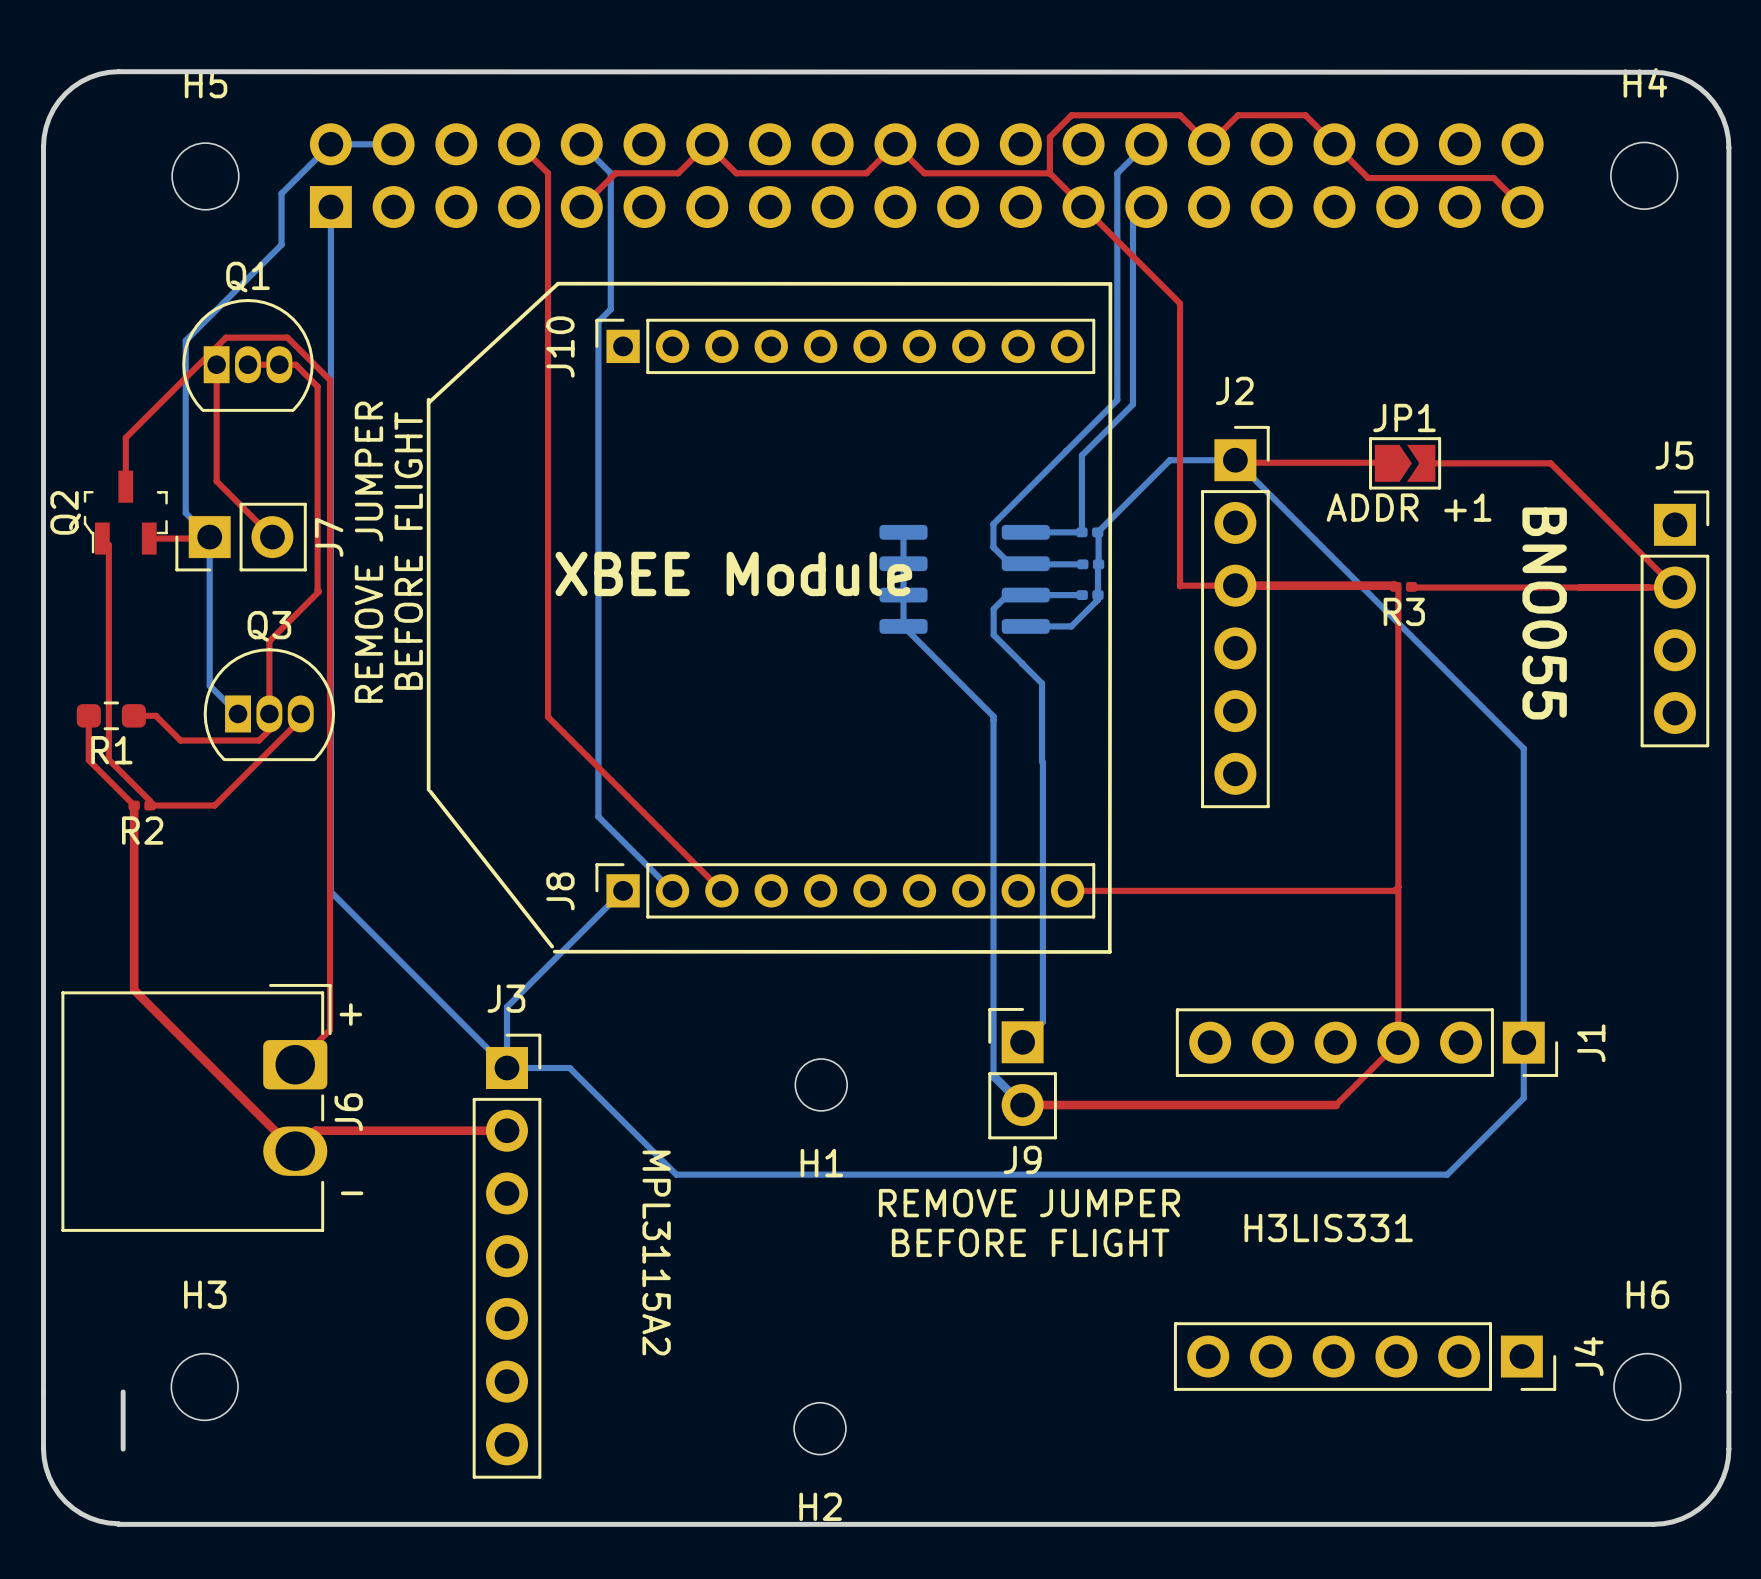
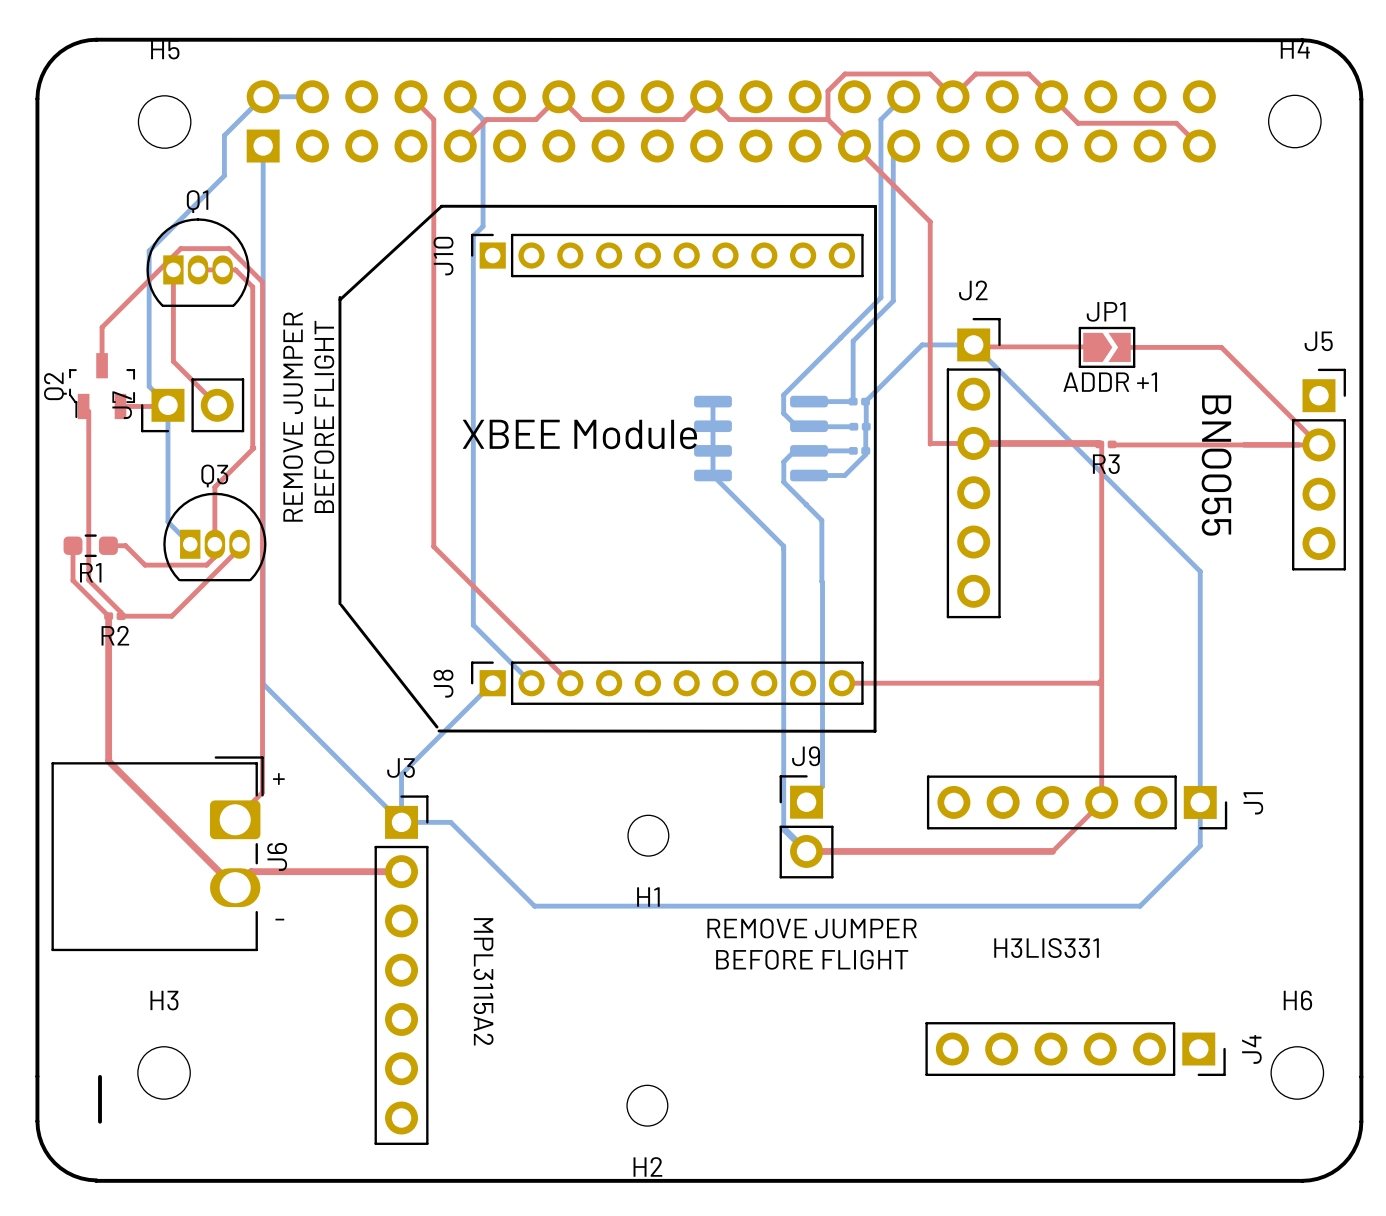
J7 name position: J7 (329, 537) -> J7 (122, 405)
J9 name position: J9 (1022, 1159) -> J9 (806, 756)
text position: MPL3115A2 (656, 1253) -> MPL3115A2 (483, 981)

